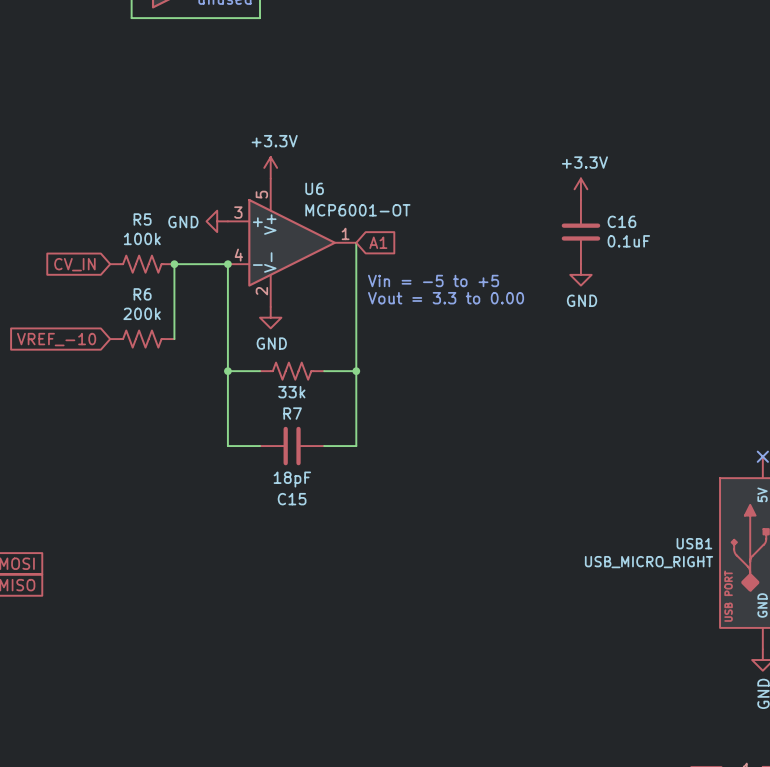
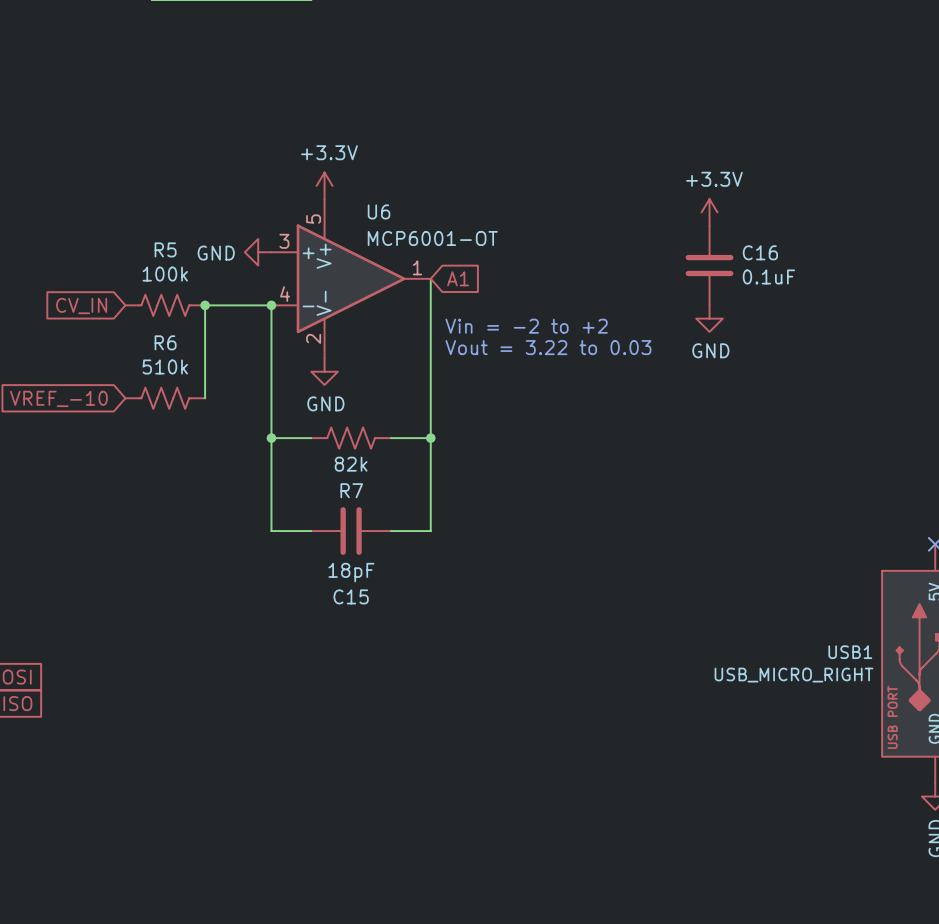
text: Vin = -5 to +5 (433, 280) -> Vin = -2 to +2 (526, 326)
text: Vout = 3.3 to 0.00 (446, 298) -> Vout = 3.22 to 0.03 (548, 347)
R6 value: 200k (142, 313) -> 510k (165, 366)
R7 value: 33k (291, 392) -> 82k (351, 464)

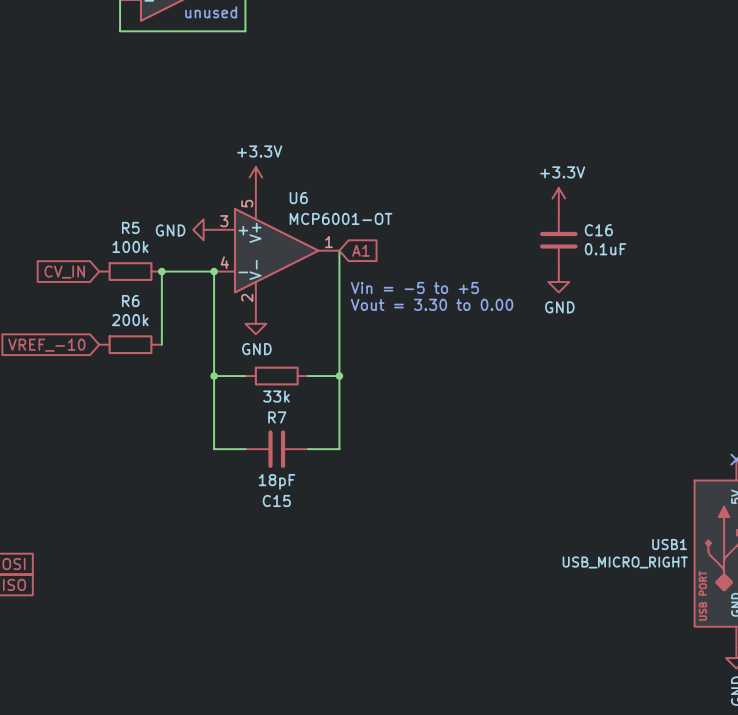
R5 symbol: [125, 294, 206, 316] -> [99, 262, 162, 281]
text: Vin = -2 to +2 (526, 326) -> Vin = -5 to +5 (414, 287)
text: Vout = 3.22 to 0.03 (548, 347) -> Vout = 3.30 to 0.00 (432, 304)
R6 value: 510k (165, 366) -> 200k (130, 320)
R6 symbol: [125, 387, 206, 409] -> [99, 335, 162, 355]
R7 symbol: [311, 427, 391, 449] -> [245, 366, 309, 386]
R7 value: 82k (351, 464) -> 33k (276, 396)

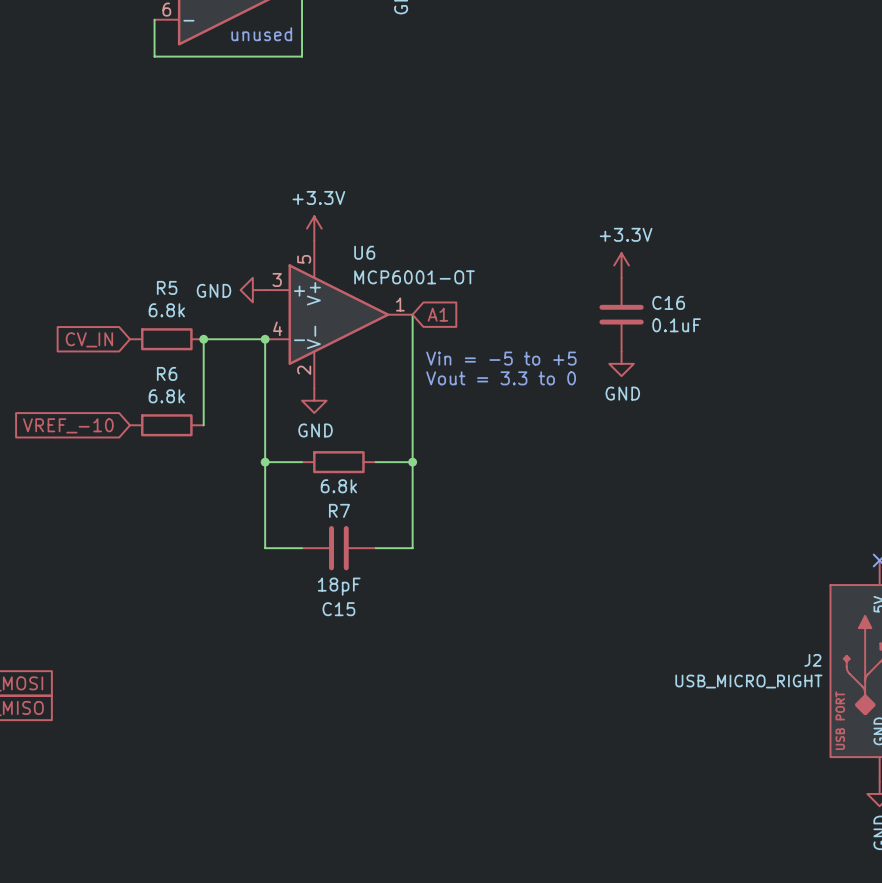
power symbol position: +3.3V (558, 198) -> +3.3V (621, 265)
C16 position: (558, 240) -> (621, 314)
R5 value: 100k (130, 246) -> 6.8k (166, 310)
power symbol position: GND (558, 282) -> GND (621, 363)
text: Vout = 3.30 to 0.00 (432, 304) -> Vout = 3.3 to 0 (501, 378)
R6 value: 200k (130, 320) -> 6.8k (166, 396)
R7 value: 33k (276, 396) -> 6.8k (338, 486)
USB1 name: USB1 (669, 544) -> J2 (812, 660)

